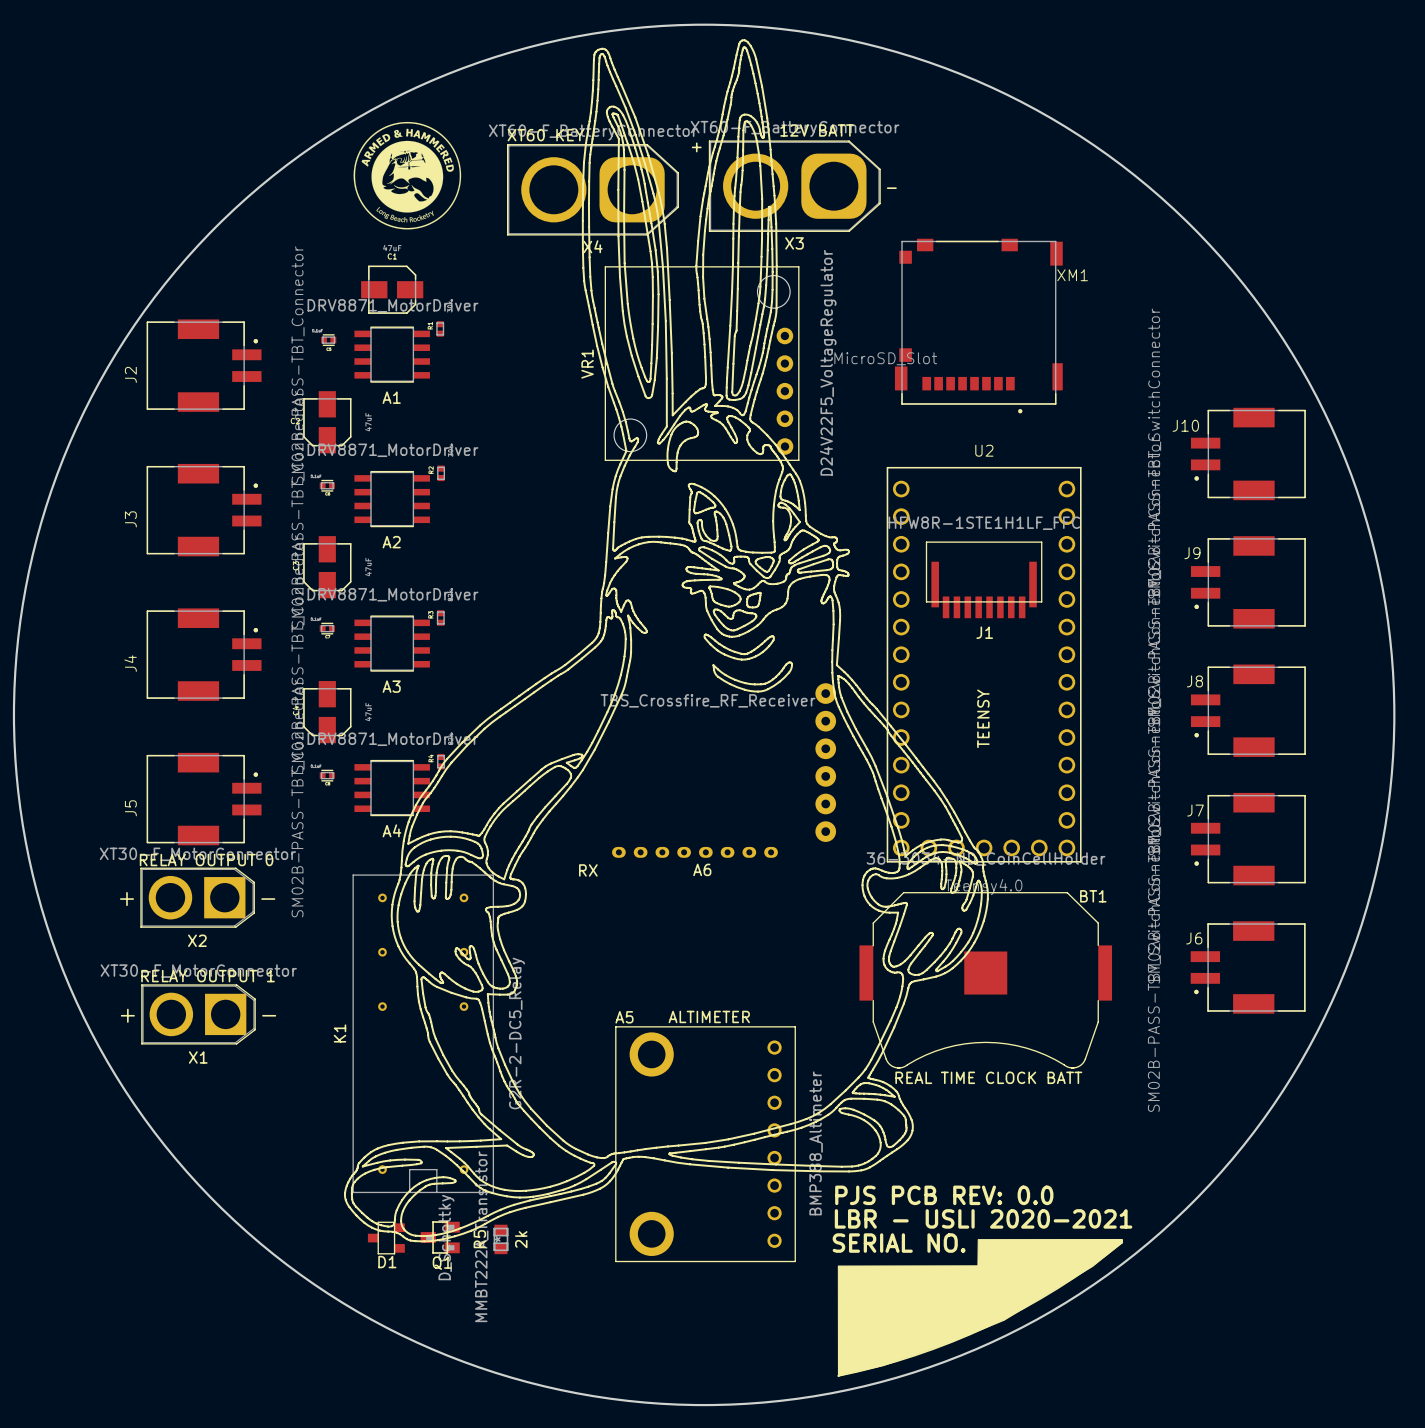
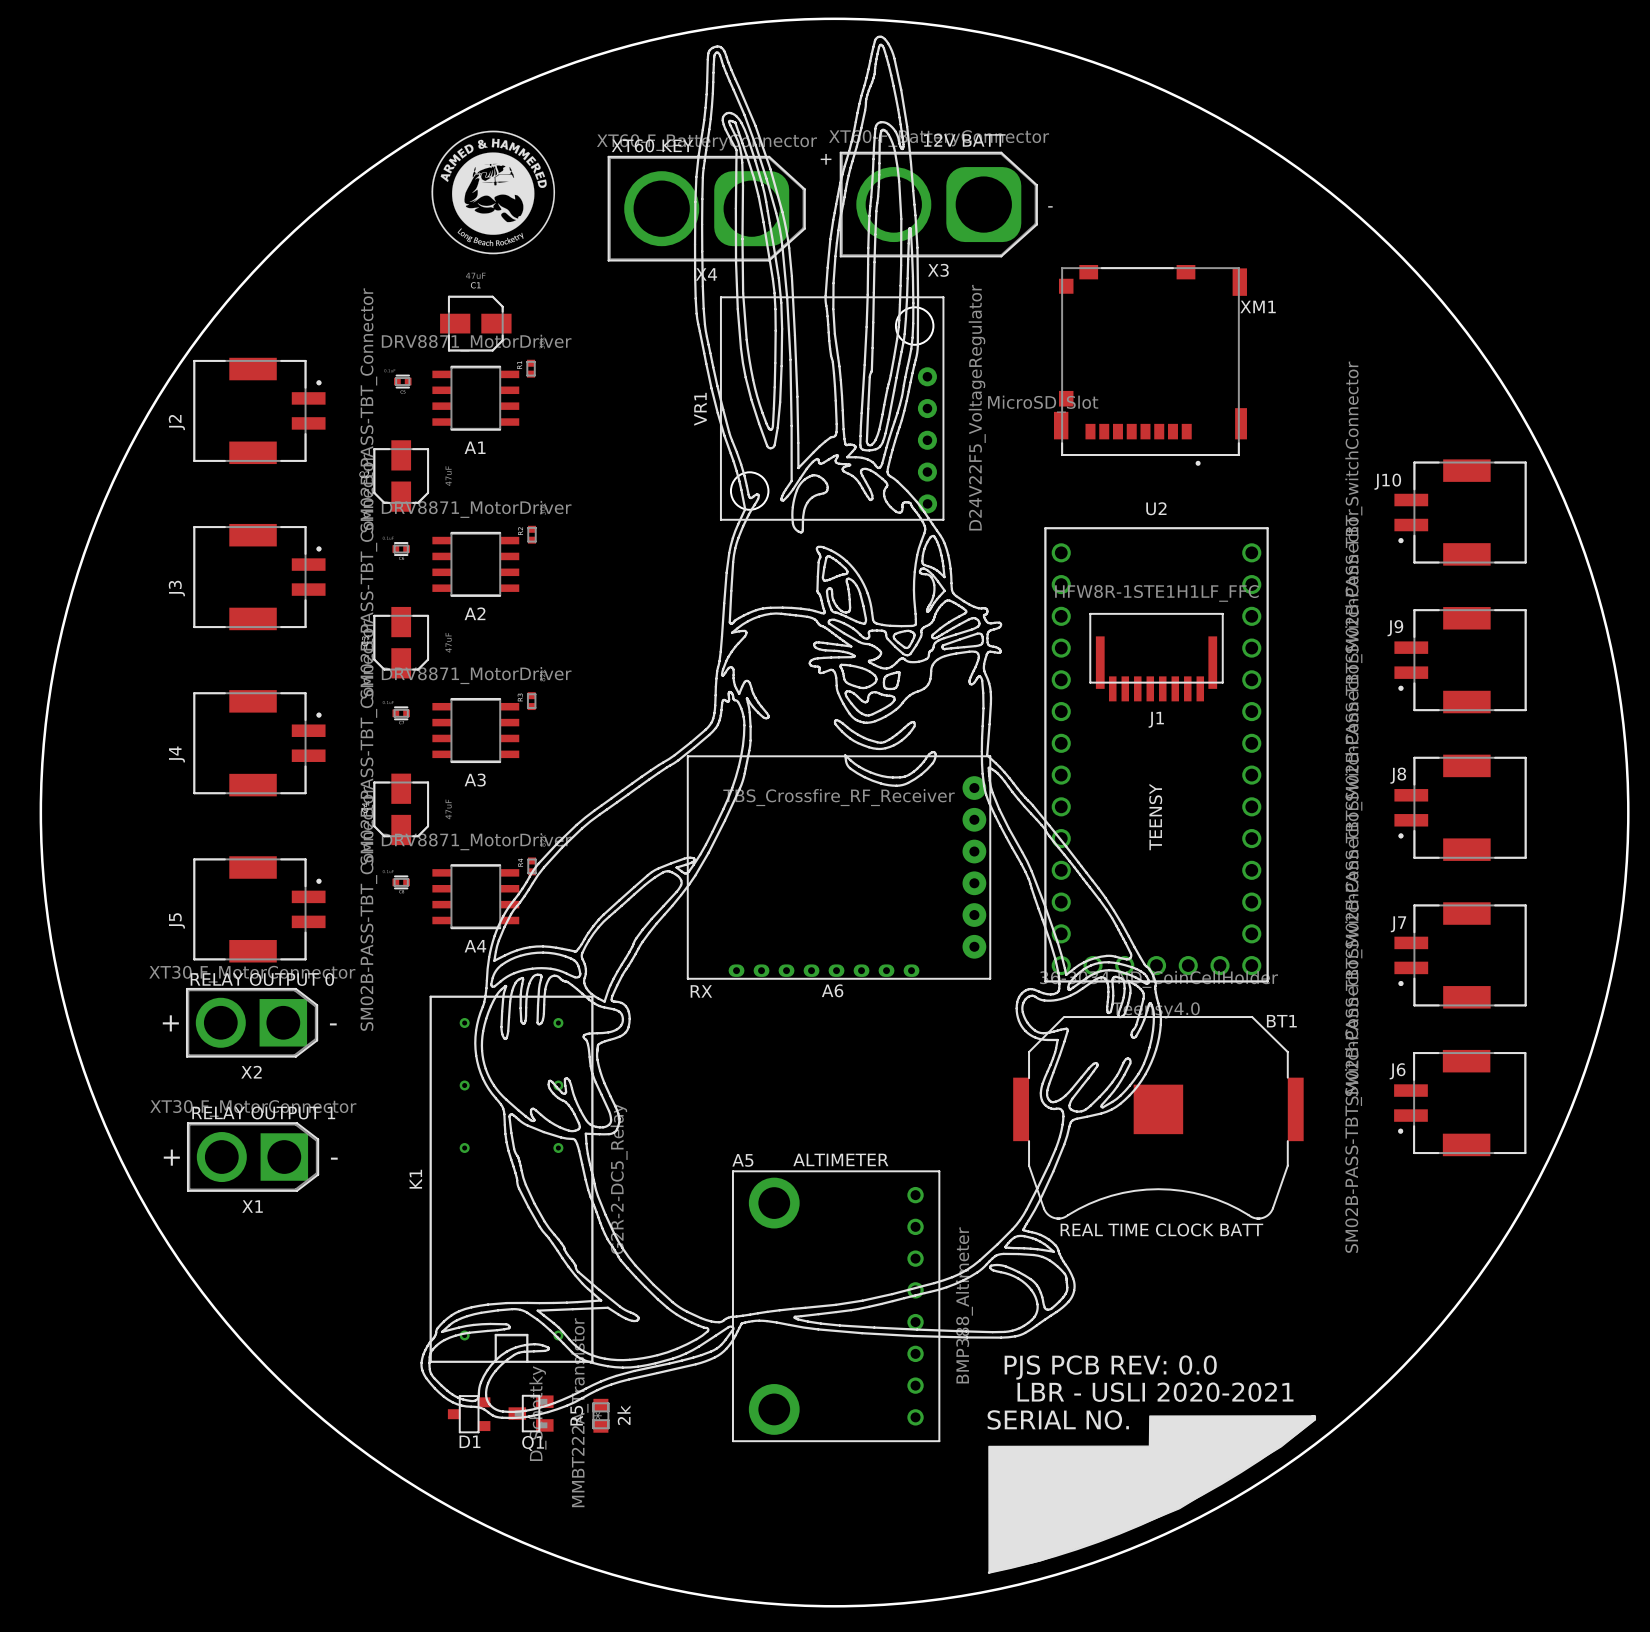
A6 footprint: [611, 683, 837, 858] -> [687, 755, 992, 980]
K1 footprint: [352, 874, 495, 1194] -> [429, 995, 594, 1363]

